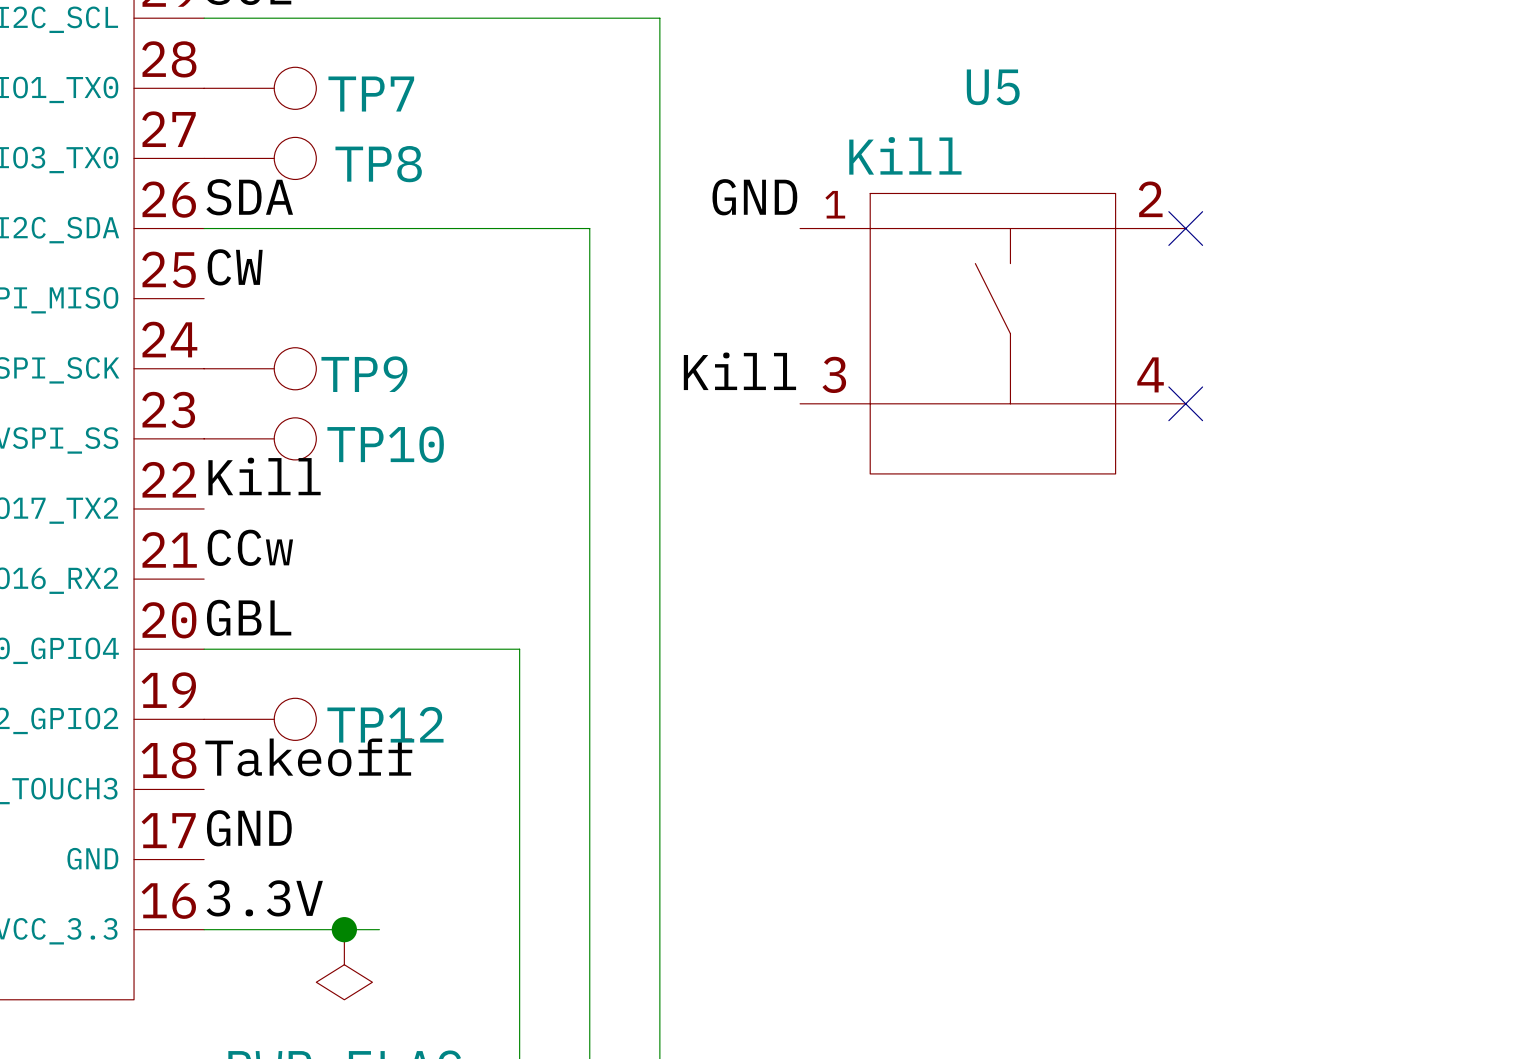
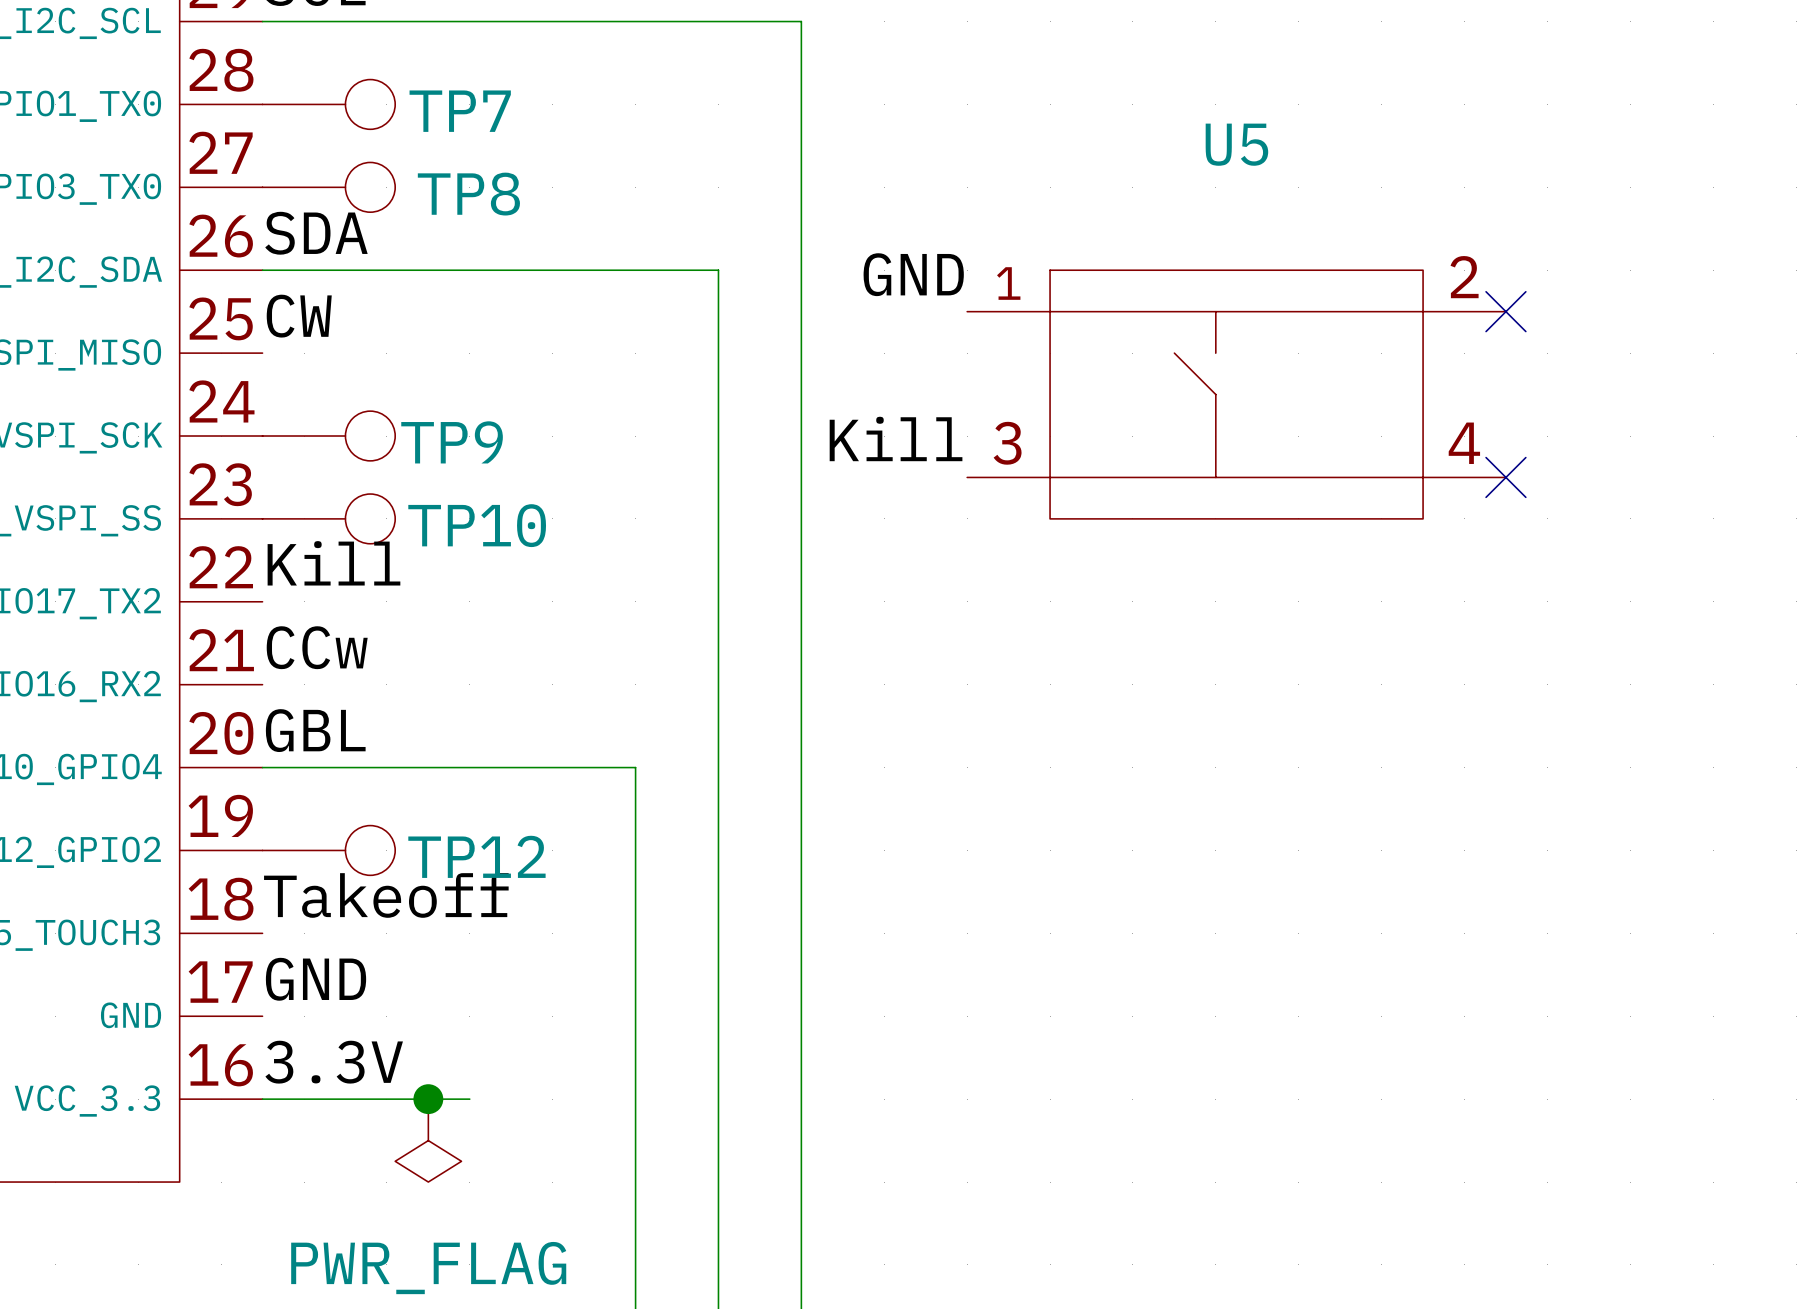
U5 text: Kill (905, 155) -> none
U5 symbol: [800, 193, 1186, 474] -> [967, 270, 1506, 519]
label position: GND (754, 197) -> GND (913, 274)
no-connect mark: (1185, 228) -> none
no-connect mark: none -> (1505, 311)
no-connect mark position: (1185, 403) -> (1505, 477)

